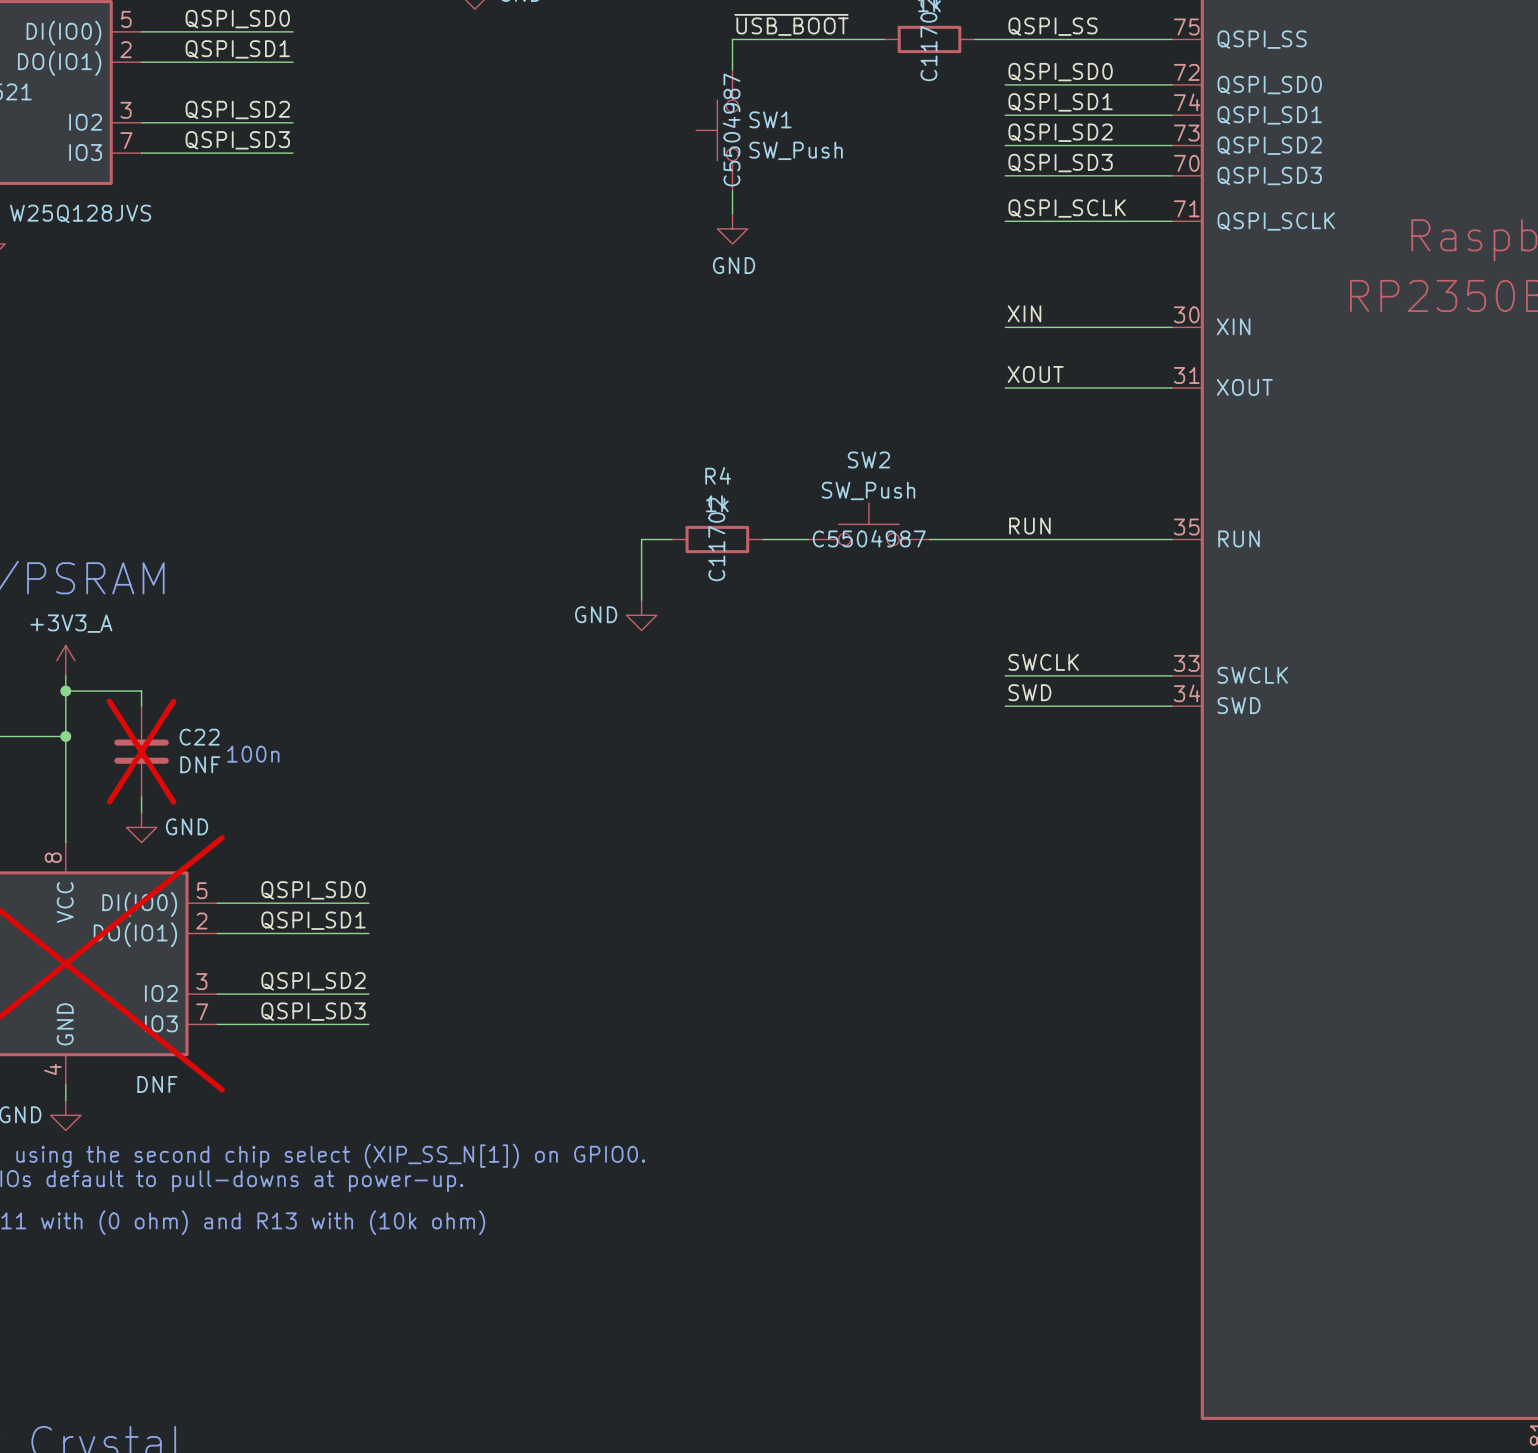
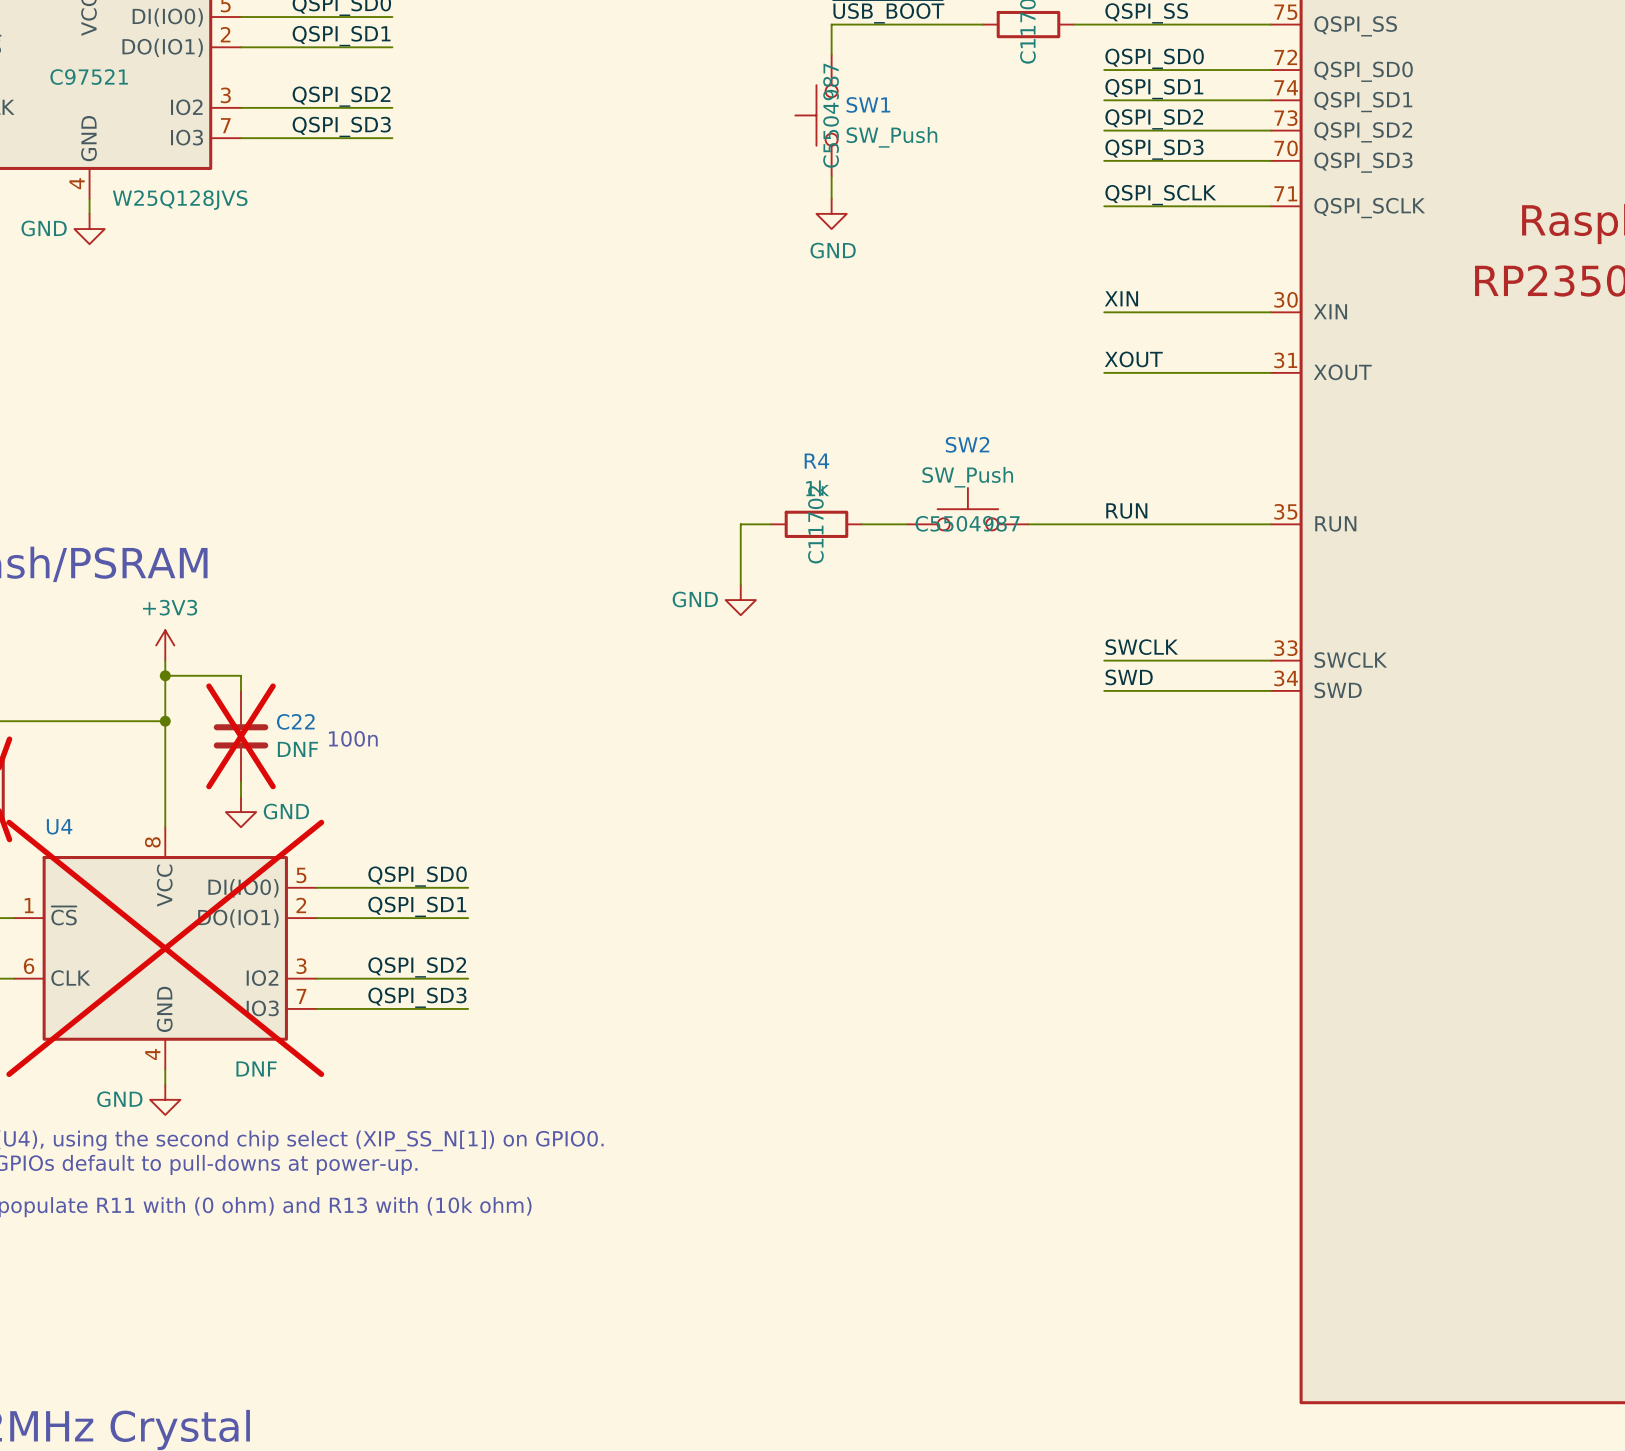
power symbol: +3V3_A (65, 660) -> +3V3 (165, 645)

